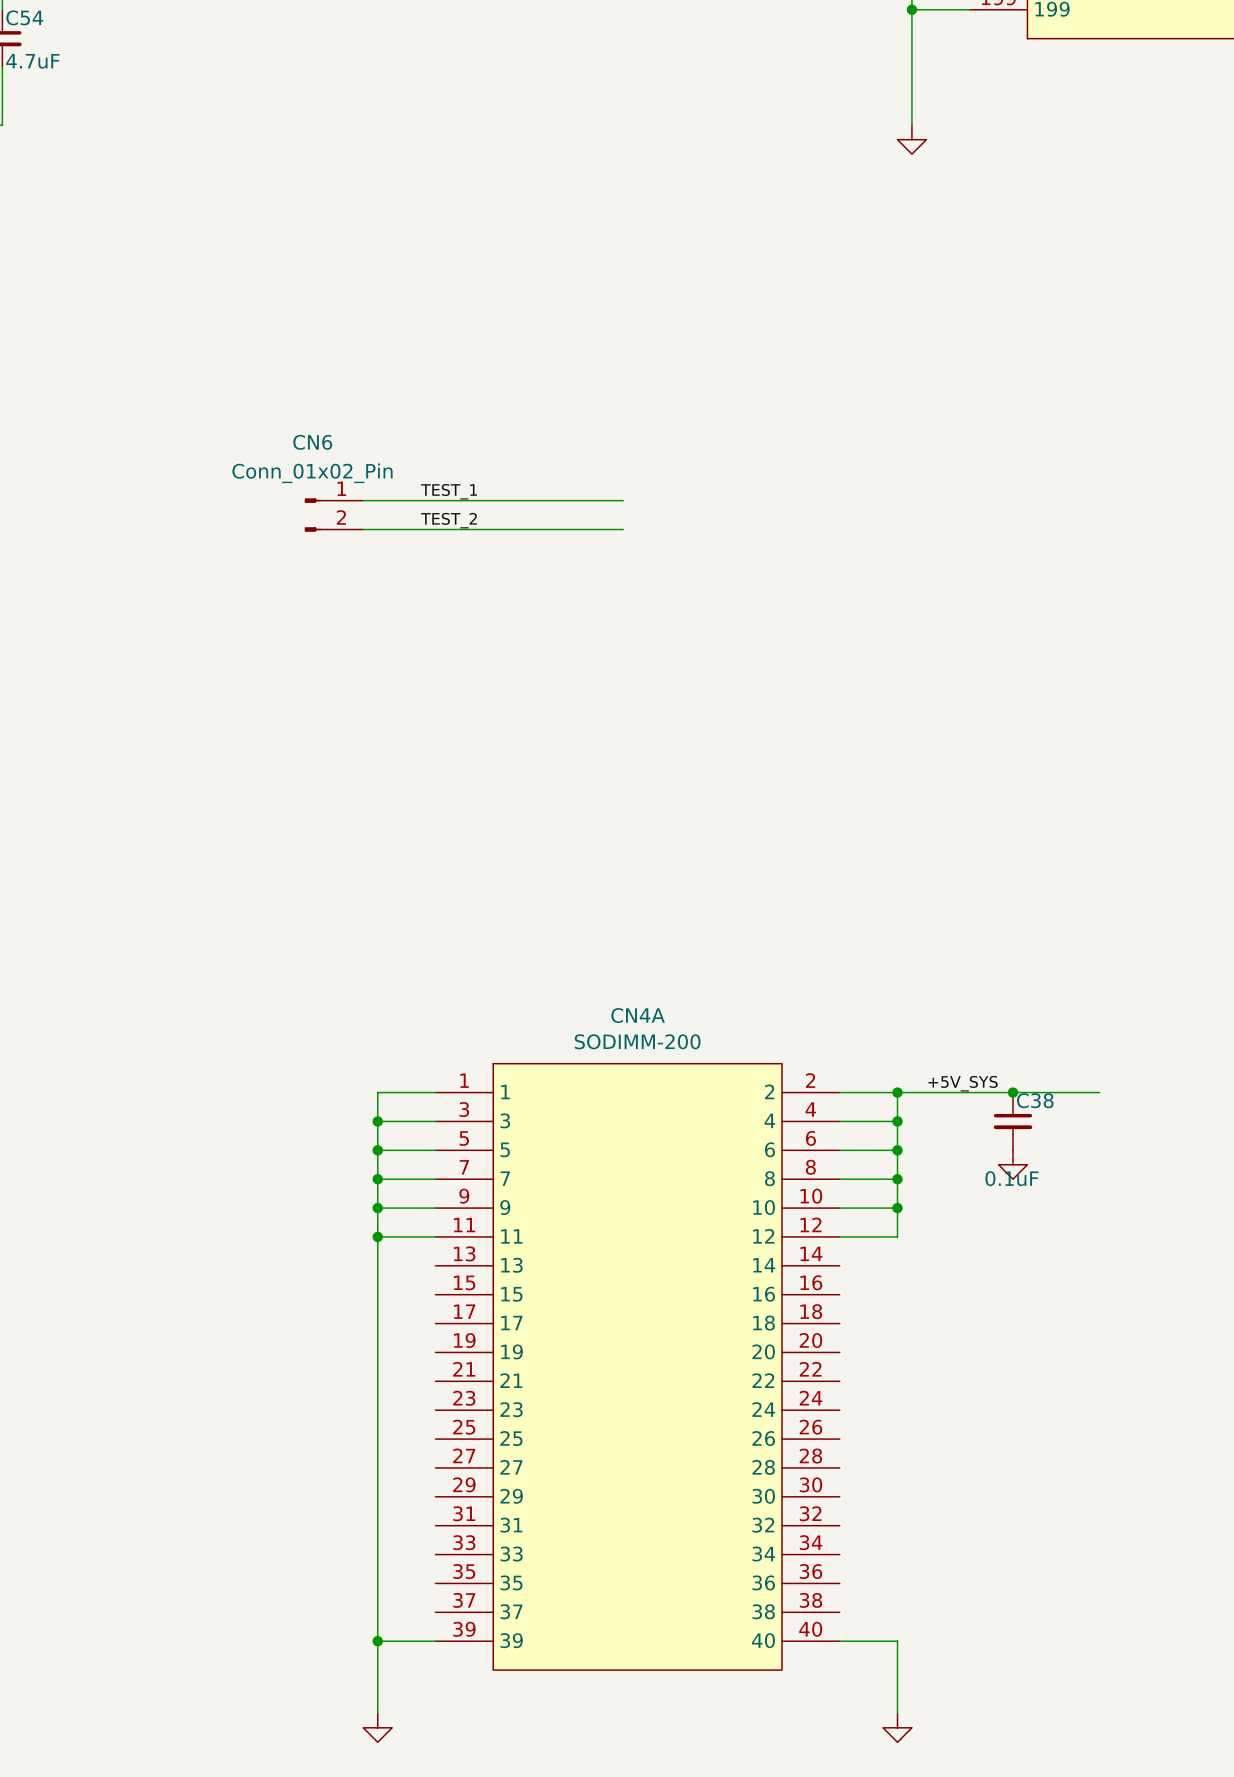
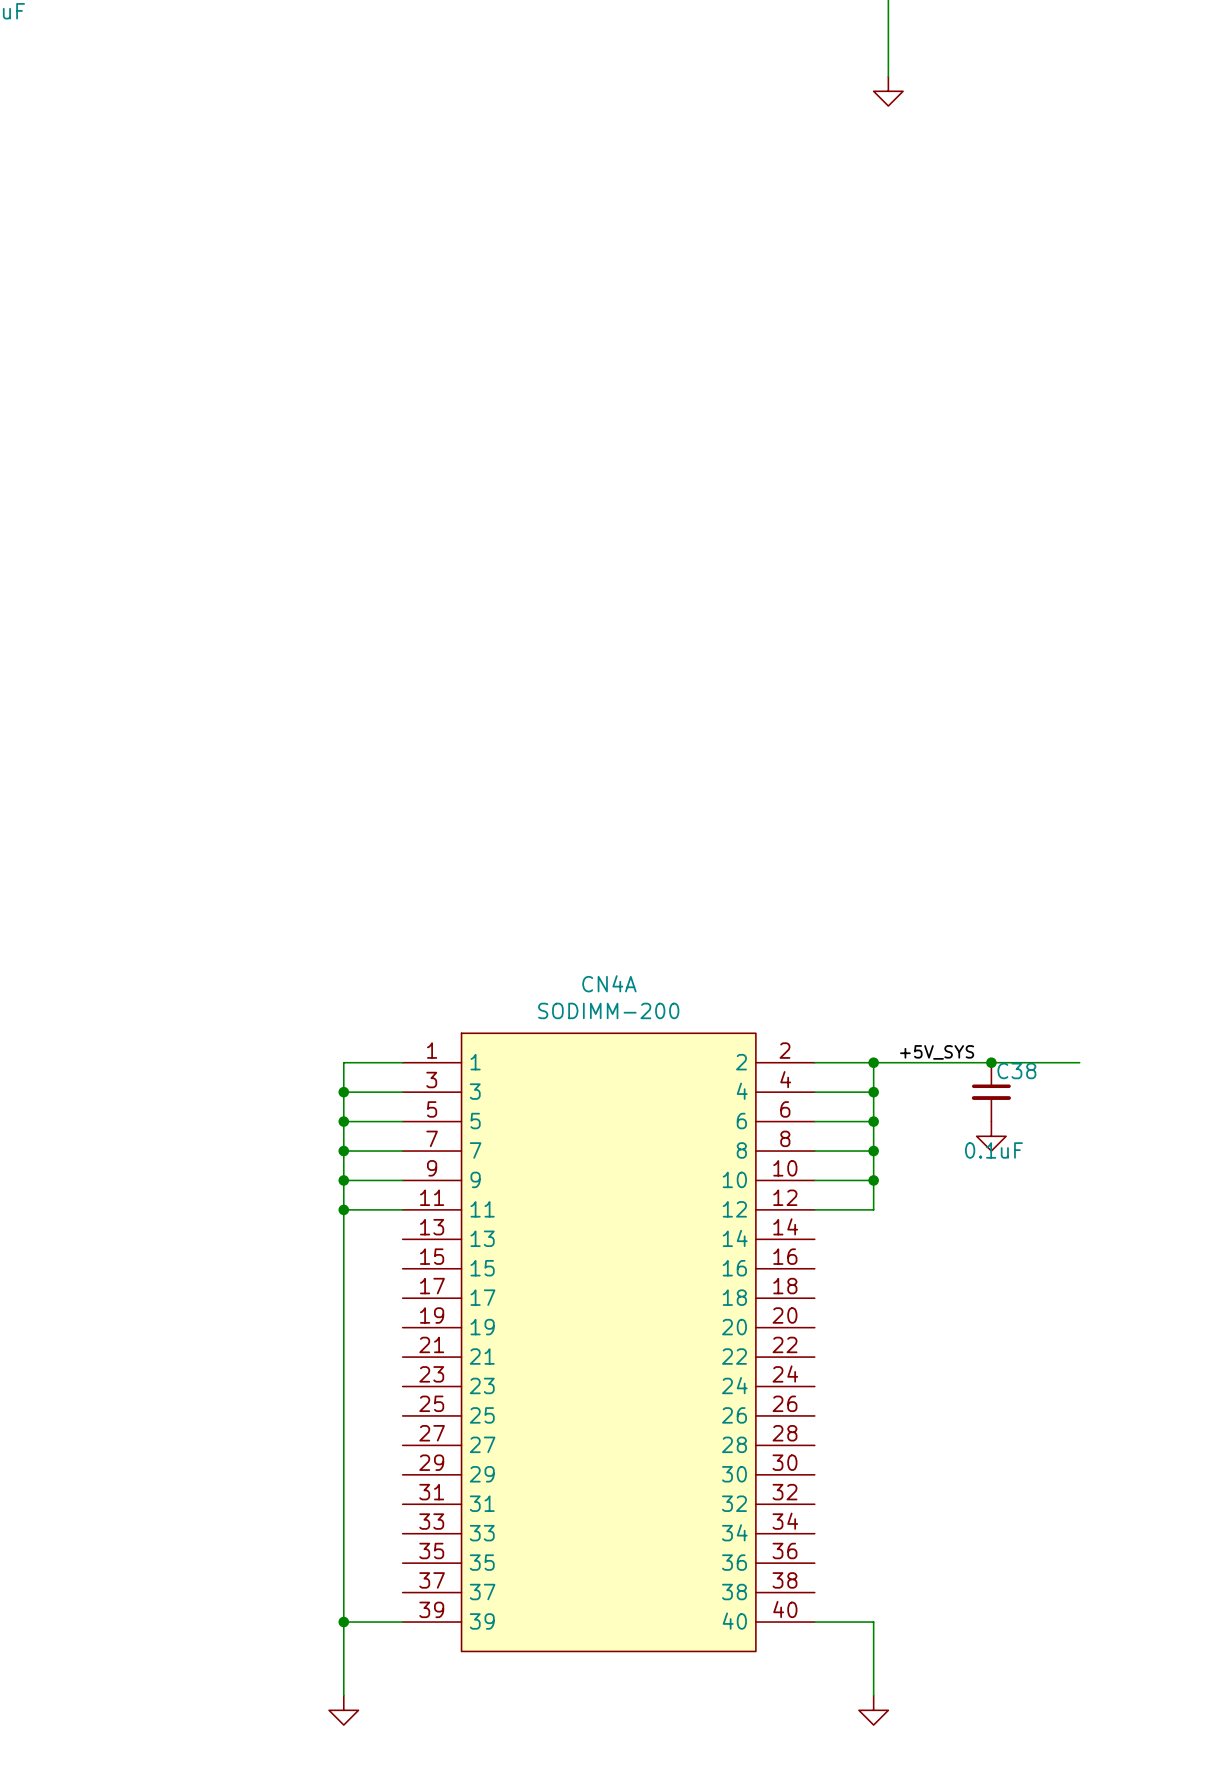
label: TEST_1 (449, 491) -> none
wire: (363, 500) (623, 500) -> none
CN6: Conn_01x02_Pin (334, 515) -> none
label: TEST_2 (448, 520) -> none
wire: (363, 529) (623, 529) -> none

